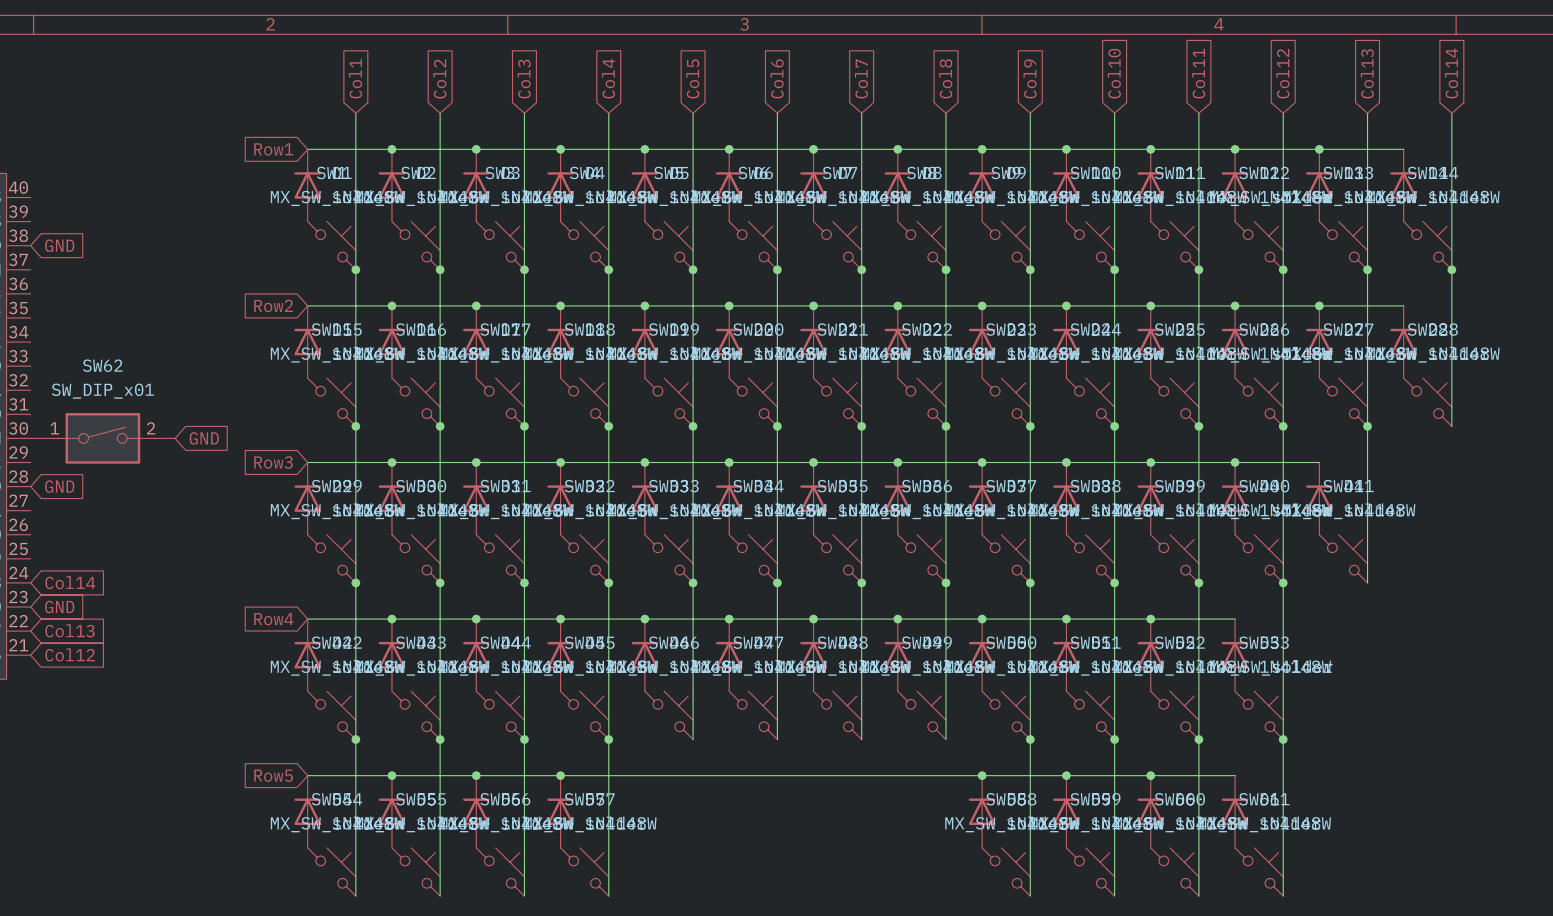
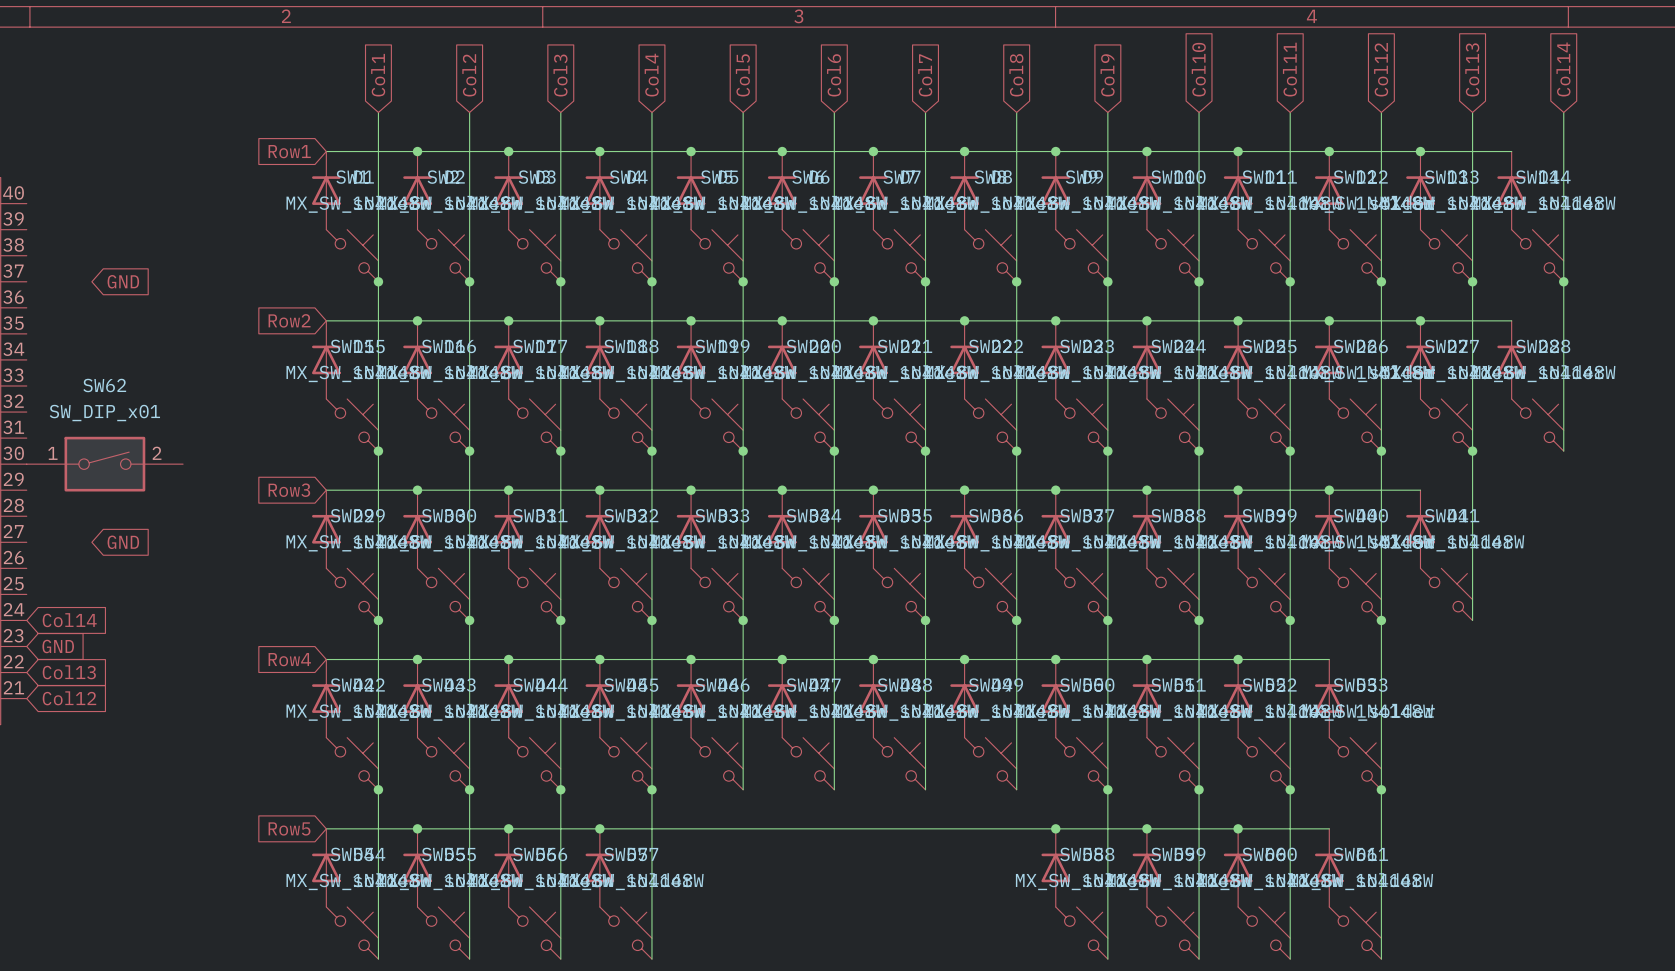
global label position: GND (59, 245) -> GND (123, 281)
global label: GND (204, 438) -> none
global label position: GND (59, 486) -> GND (123, 542)

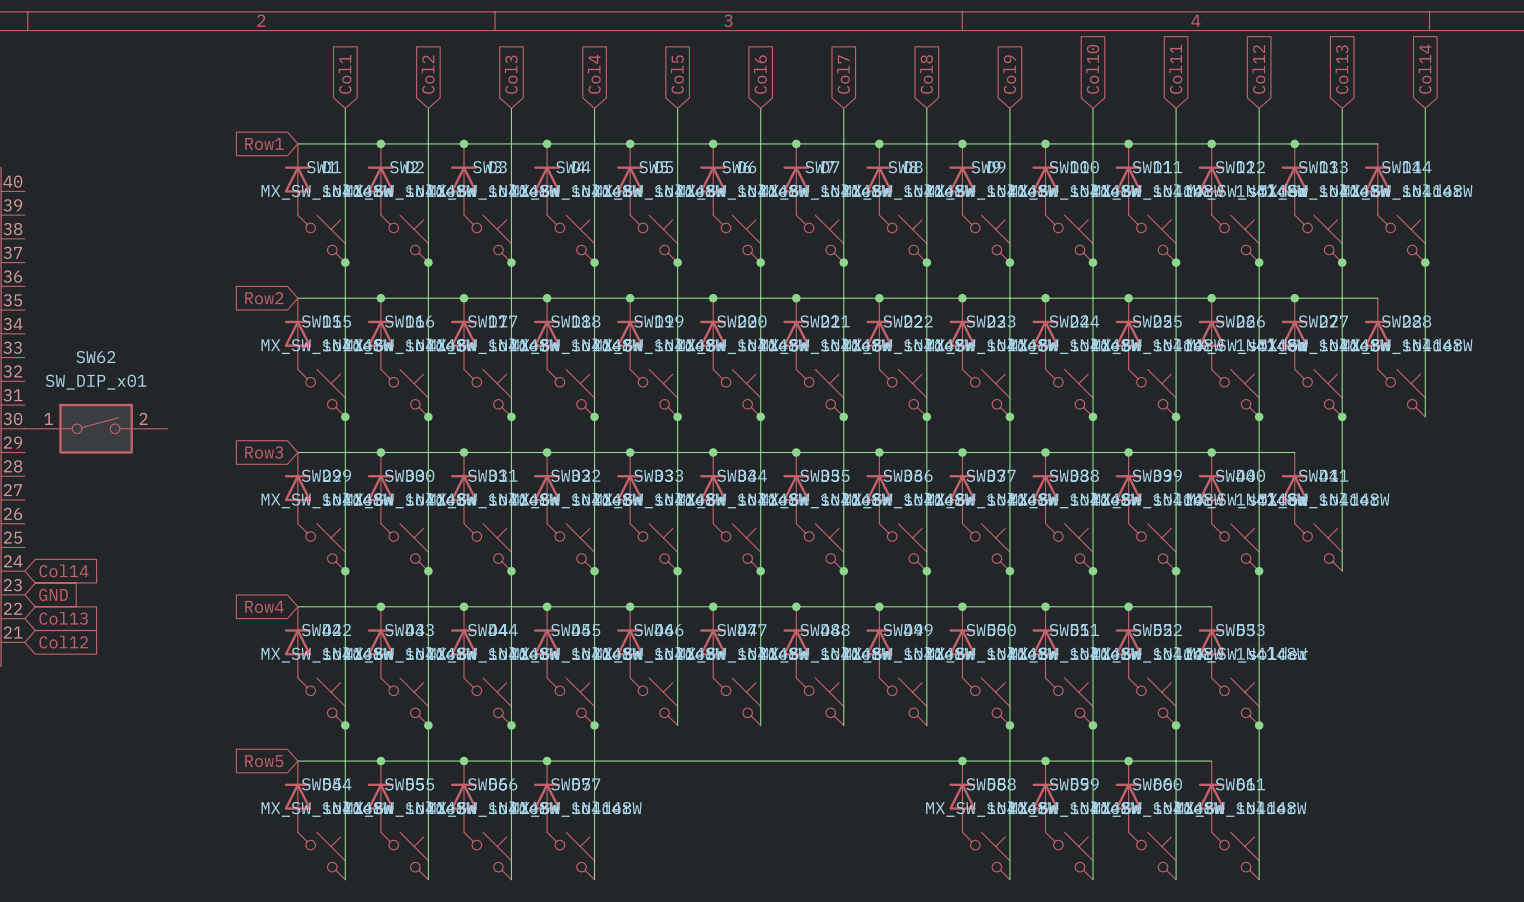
global label: GND (123, 281) -> none
global label: GND (123, 542) -> none

